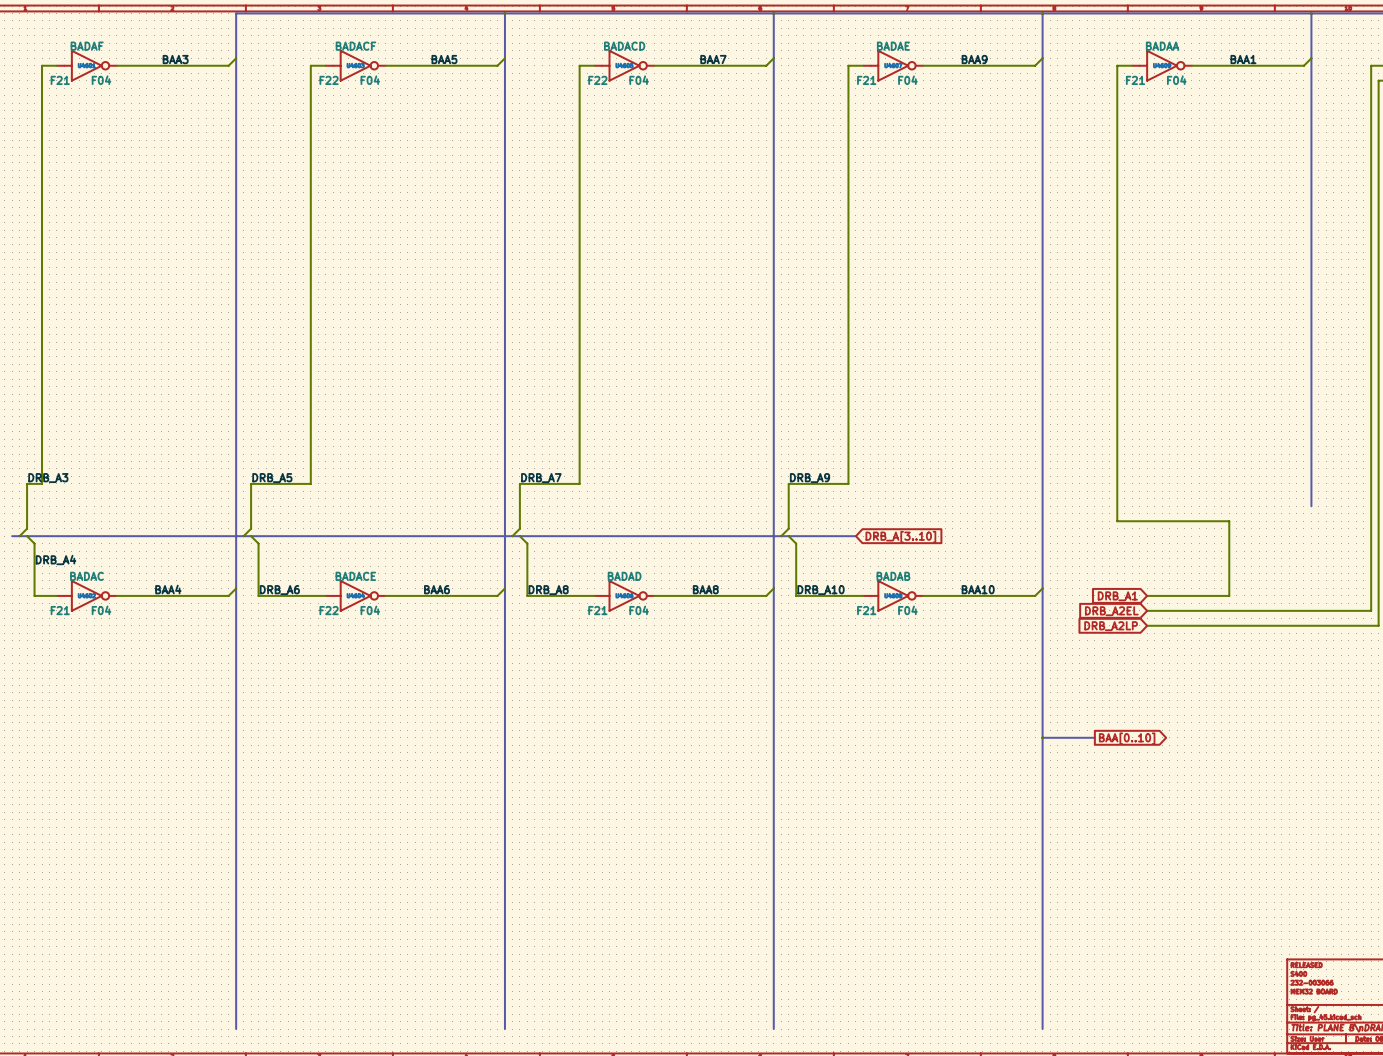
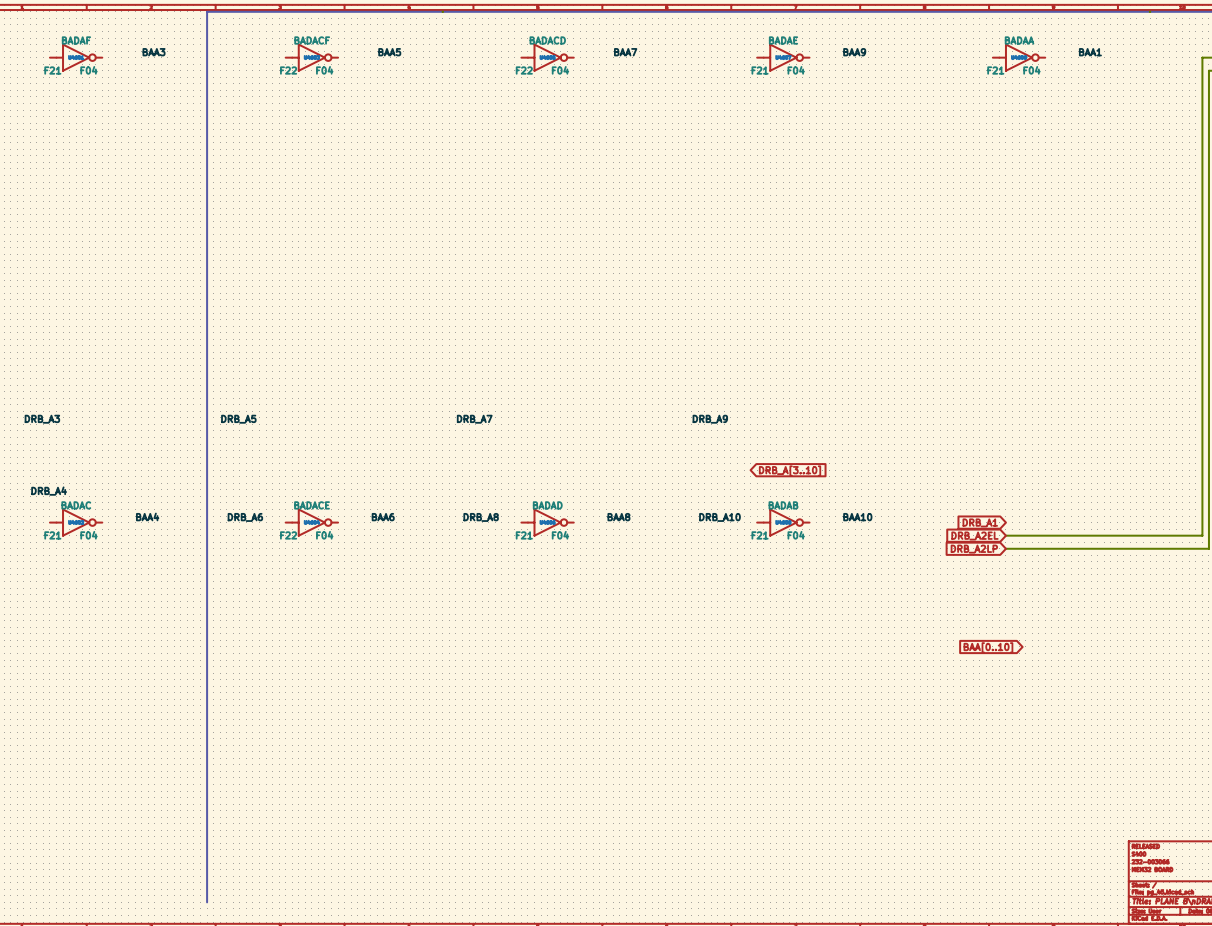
bus: (504, 13) (504, 1029) -> none
bus: (773, 13) (773, 1029) -> none
junction: (773, 13) -> none
bus: (1042, 13) (1042, 1029) -> none
junction: (1042, 13) -> none
bus: (1311, 13) (1311, 506) -> none
wire: (236, 58) (228, 65) (116, 65) -> none
wire: (504, 58) (497, 65) (385, 65) -> none
wire: (773, 58) (766, 65) (654, 65) -> none
wire: (1042, 58) (1035, 65) (923, 65) -> none
wire: (1311, 58) (1303, 65) (1191, 65) -> none
wire: (56, 65) (42, 65) (42, 483) (27, 483) (27, 528) (19, 536) -> none
wire: (325, 65) (310, 65) (310, 483) (251, 483) (251, 528) (243, 536) -> none
wire: (594, 65) (579, 65) (579, 483) (519, 483) (519, 528) (512, 536) -> none
wire: (863, 65) (848, 65) (848, 483) (788, 483) (788, 528) (781, 536) -> none
wire: (1132, 65) (1117, 65) (1117, 521) (1229, 521) (1229, 595) (1147, 595) -> none
bus: (12, 536) (855, 536) -> none
wire: (27, 536) (34, 543) (34, 595) (56, 595) -> none
wire: (251, 536) (258, 543) (258, 595) (325, 595) -> none
wire: (519, 536) (527, 543) (527, 595) (594, 595) -> none
wire: (788, 536) (796, 543) (796, 595) (863, 595) -> none
wire: (236, 588) (228, 595) (116, 595) -> none
wire: (504, 588) (497, 595) (385, 595) -> none
wire: (773, 588) (766, 595) (654, 595) -> none
wire: (1042, 588) (1035, 595) (923, 595) -> none
bus: (1042, 737) (1094, 737) -> none
junction: (1042, 737) -> none

